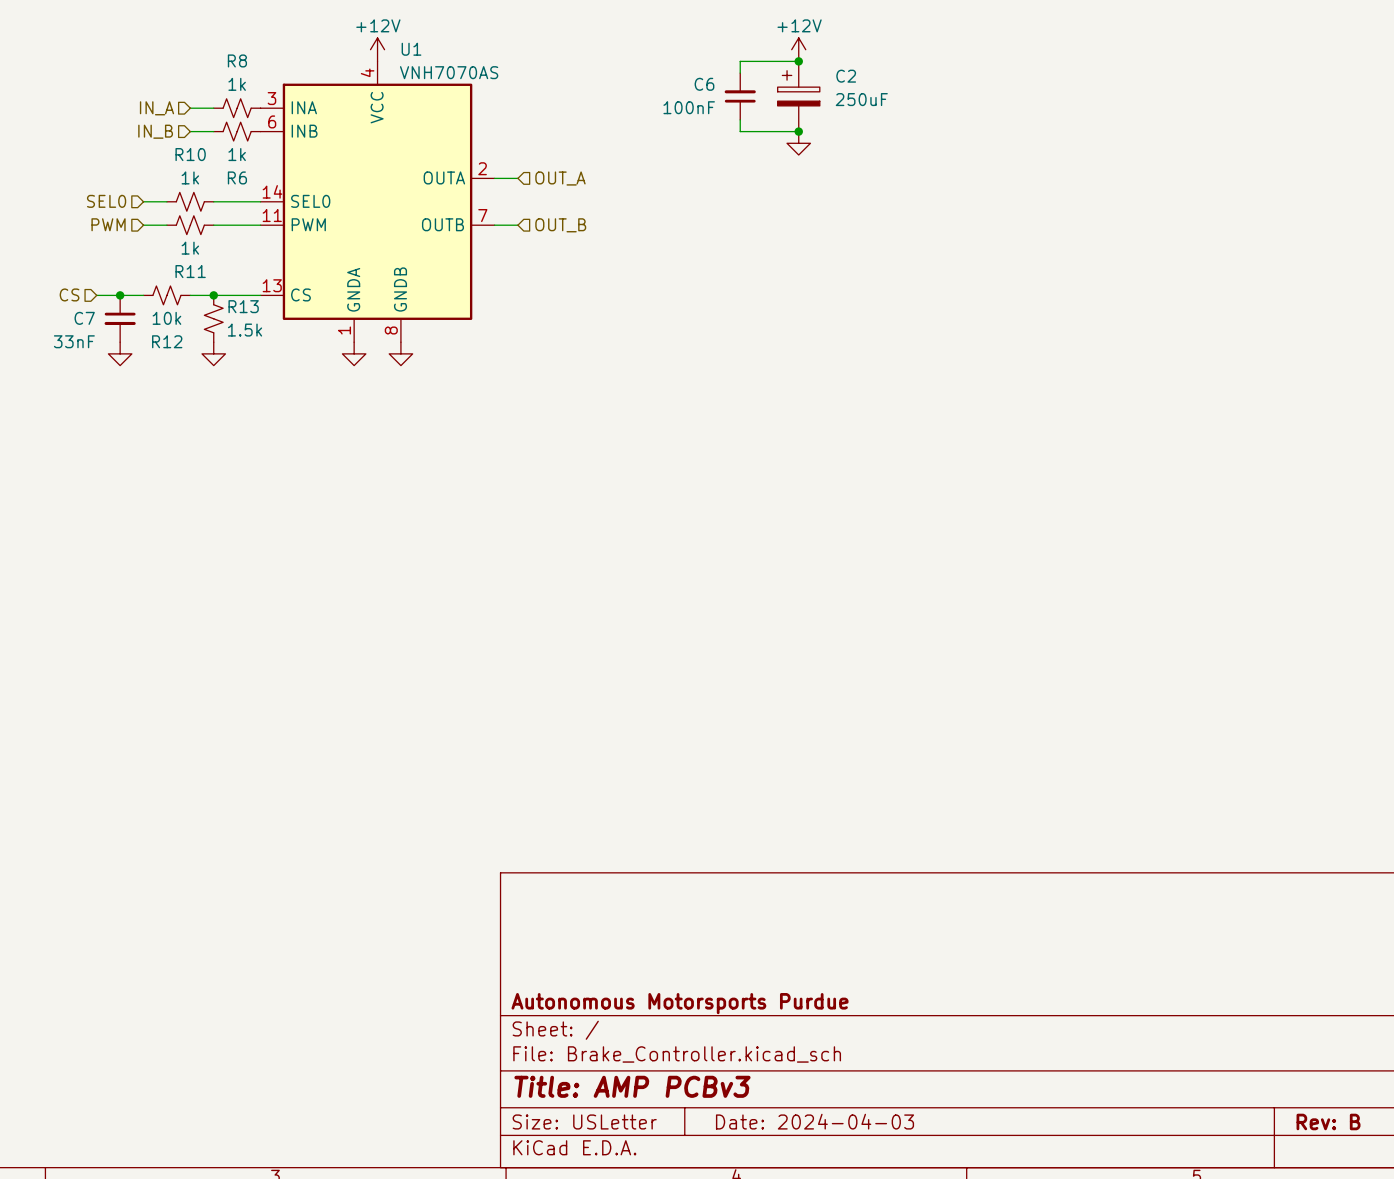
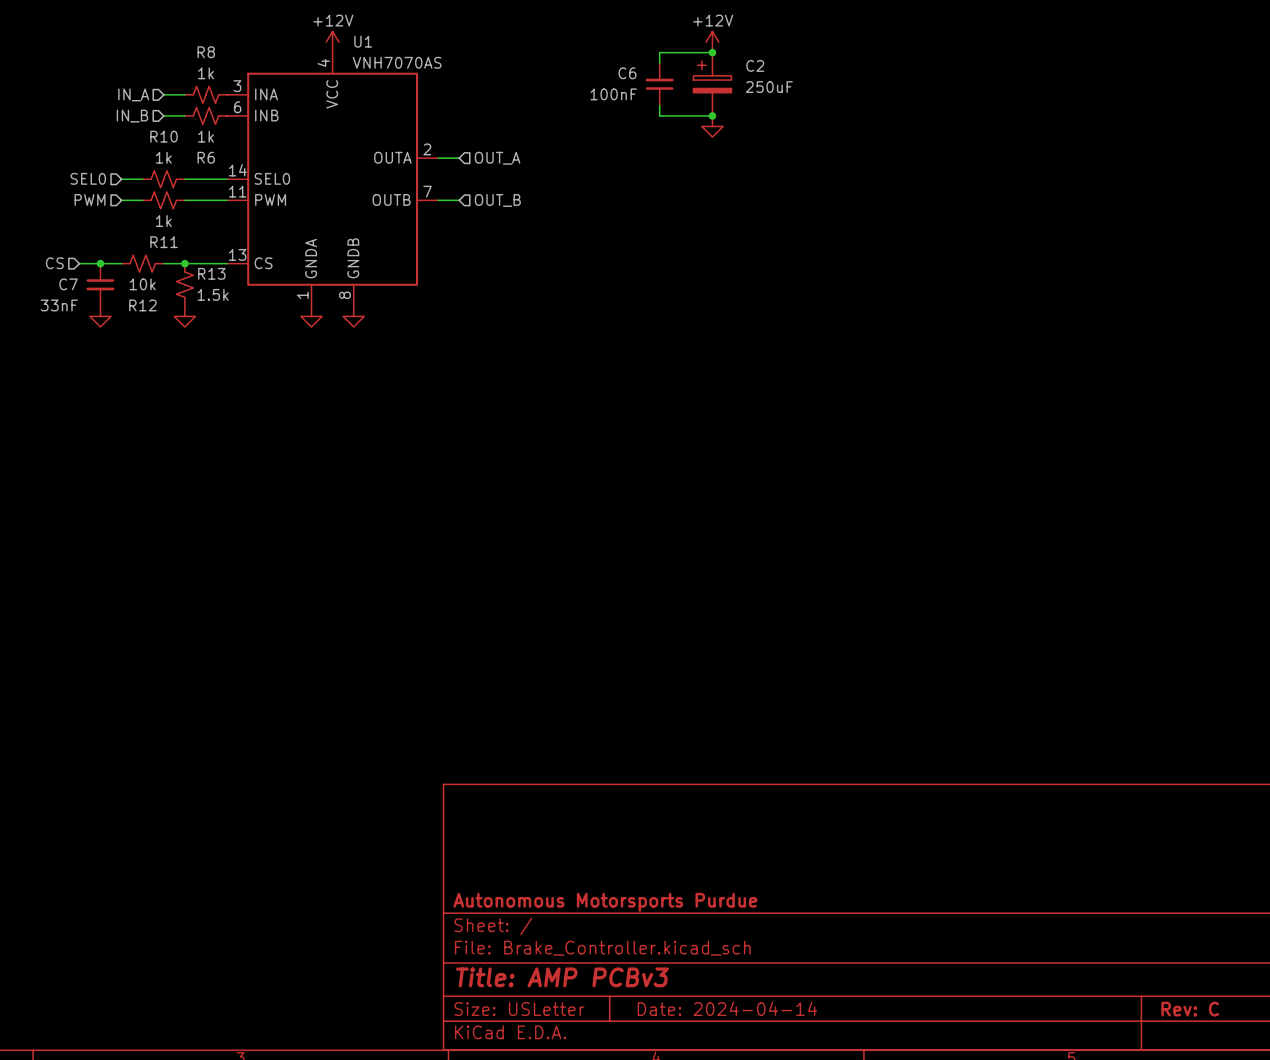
title block: Date: 2024-04-03 (815, 1121) -> Date: 2024-04-14 (727, 1008)
title block: Rev: B (1328, 1121) -> Rev: C (1190, 1009)

